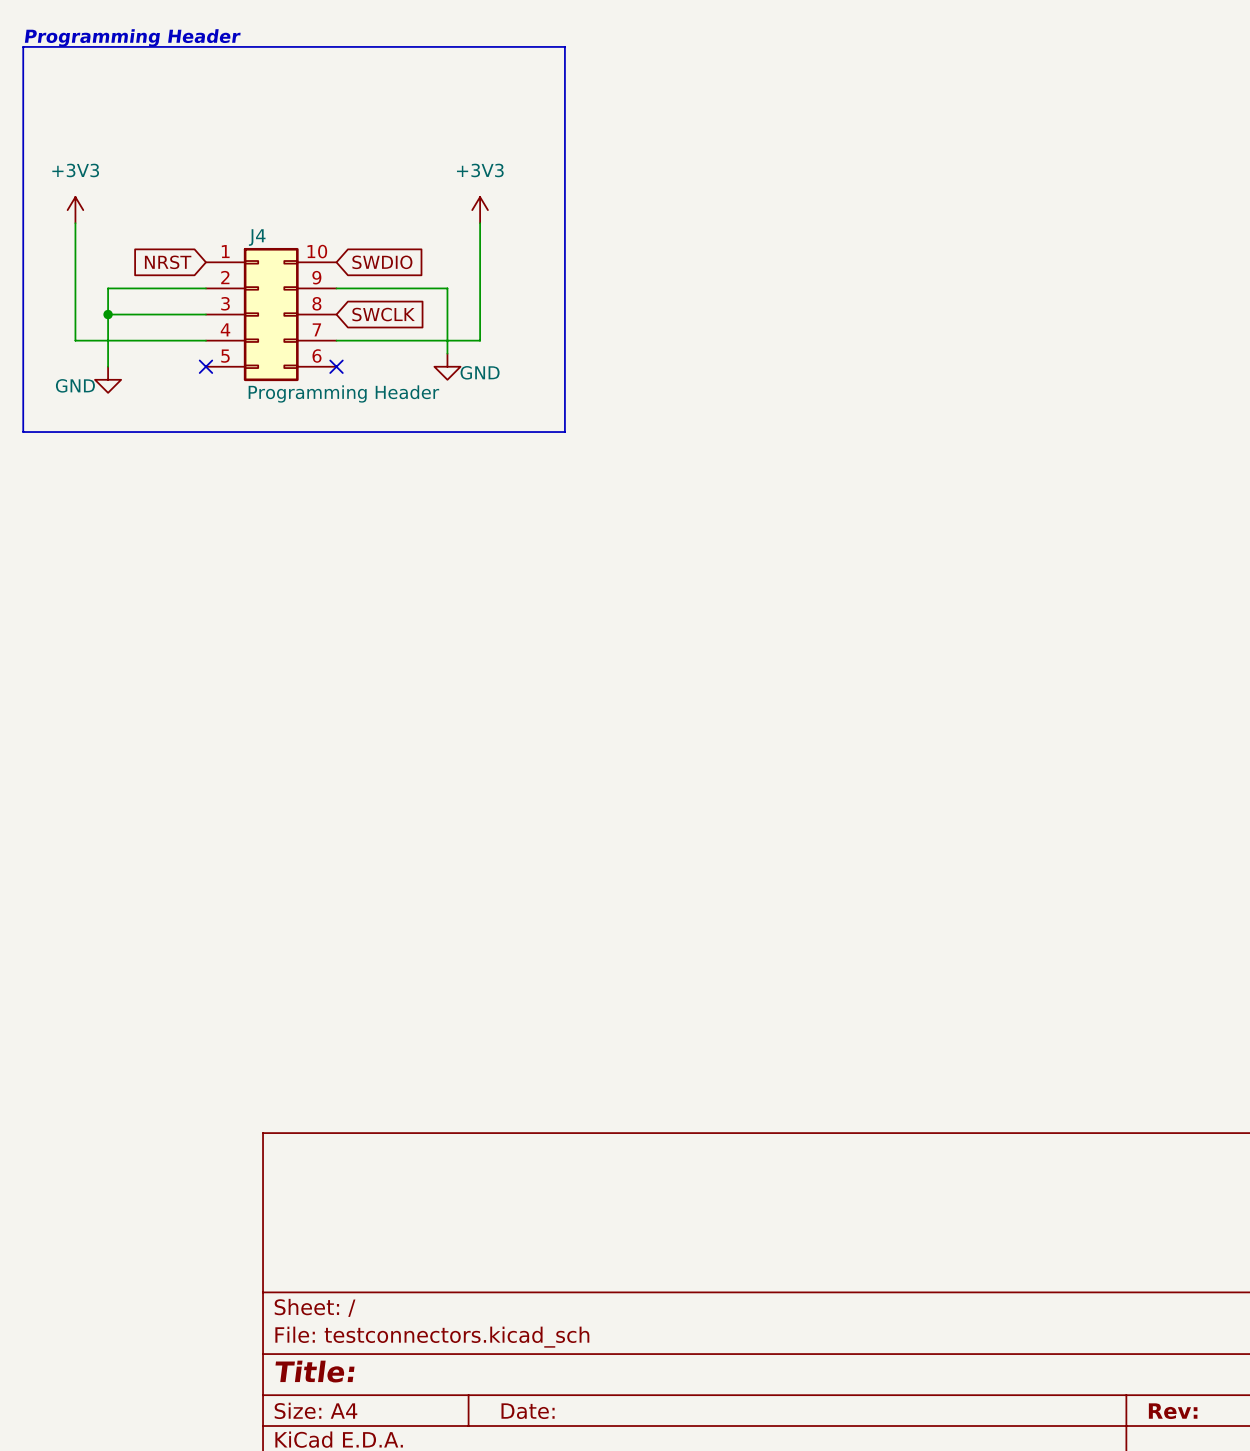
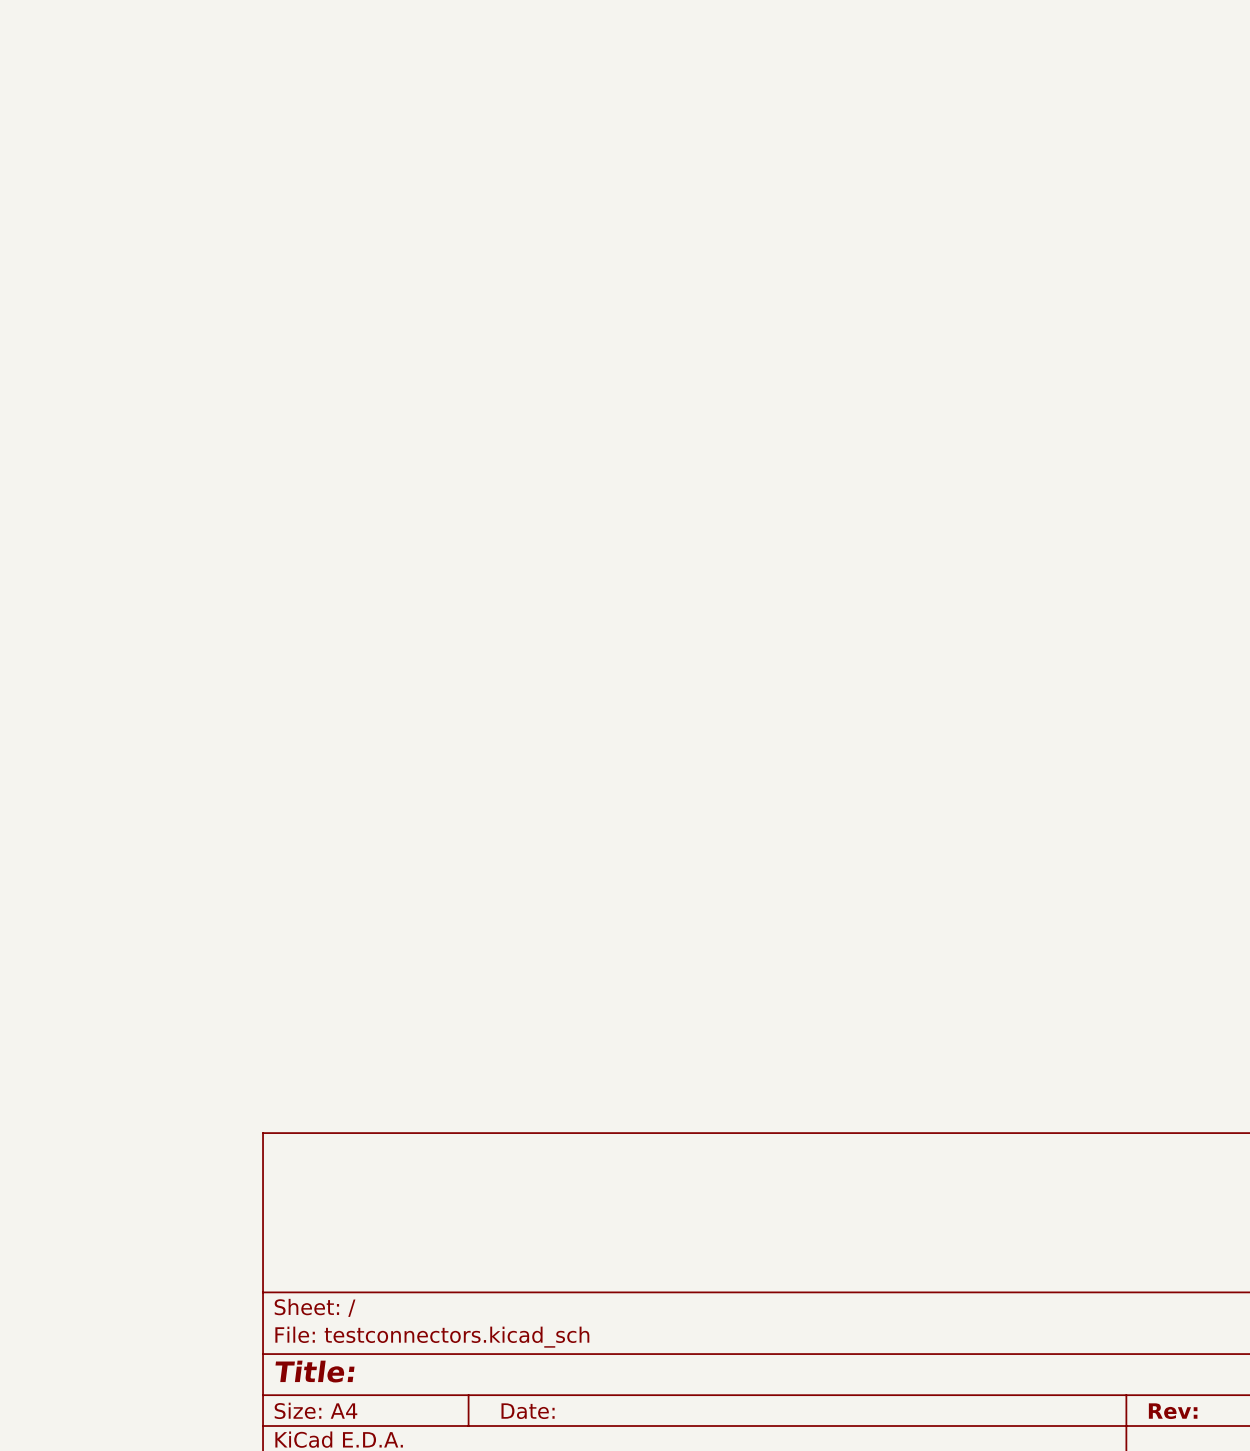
text: Programming Header (132, 37) -> none
line: (23, 46) (23, 432) (564, 432) (564, 46) (23, 46) -> none
power symbol: +3V3 (75, 210) -> none
power symbol: +3V3 (480, 210) -> none
wire: (75, 223) (75, 340) (205, 340) -> none
wire: (480, 223) (480, 340) (336, 340) -> none
global label: NRST (168, 262) -> none
global label: SWDIO (382, 262) -> none
wire: (205, 288) (108, 288) (108, 366) -> none
wire: (336, 288) (447, 288) (447, 353) -> none
wire: (108, 314) (205, 314) -> none
junction: (108, 314) -> none
J4: Programming Header (271, 314) -> none
global label: SWCLK (383, 314) -> none
no-connect mark: (205, 366) -> none
no-connect mark: (336, 366) -> none
power symbol: GND (447, 366) -> none
power symbol: GND (108, 379) -> none

